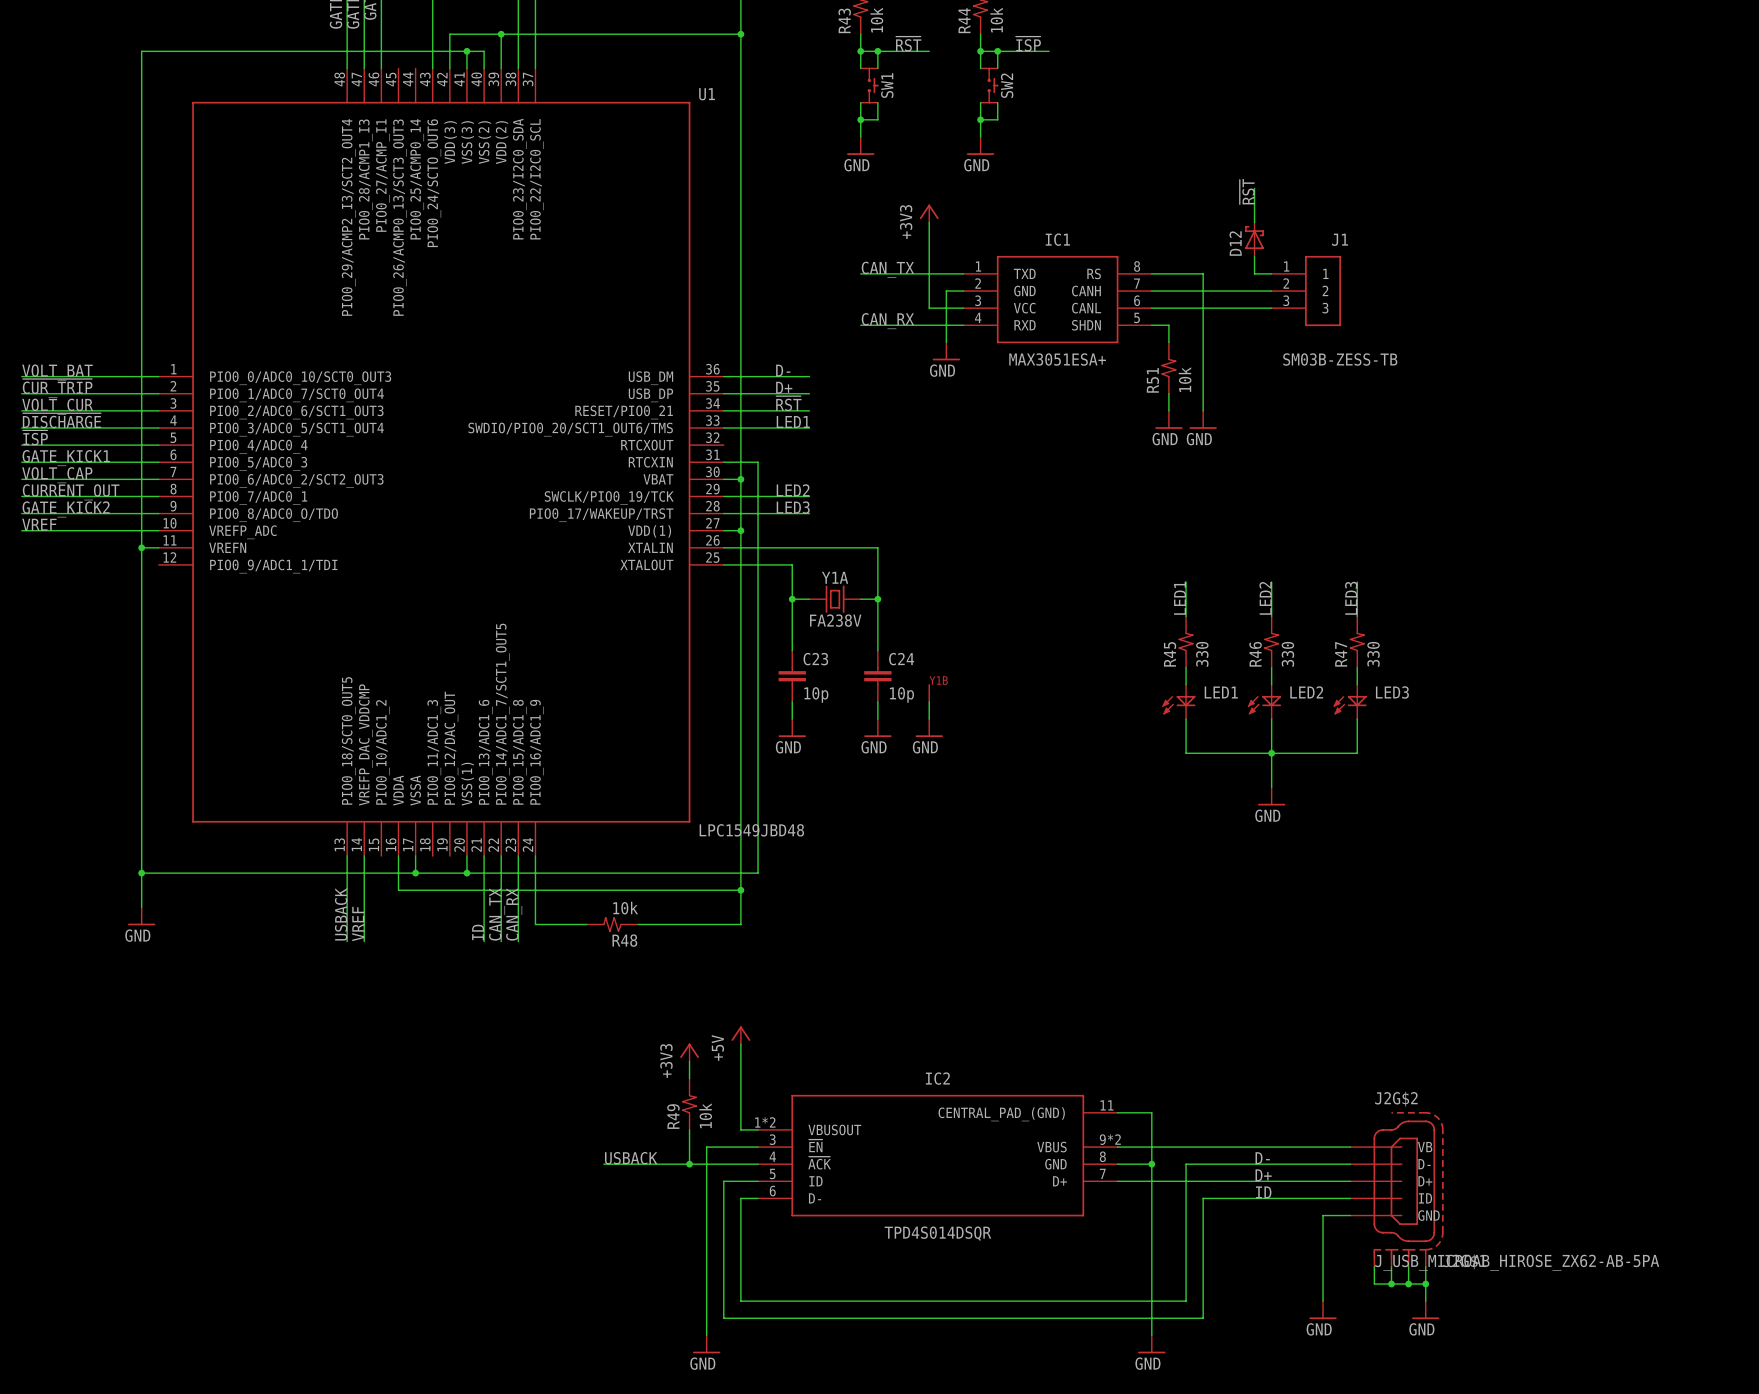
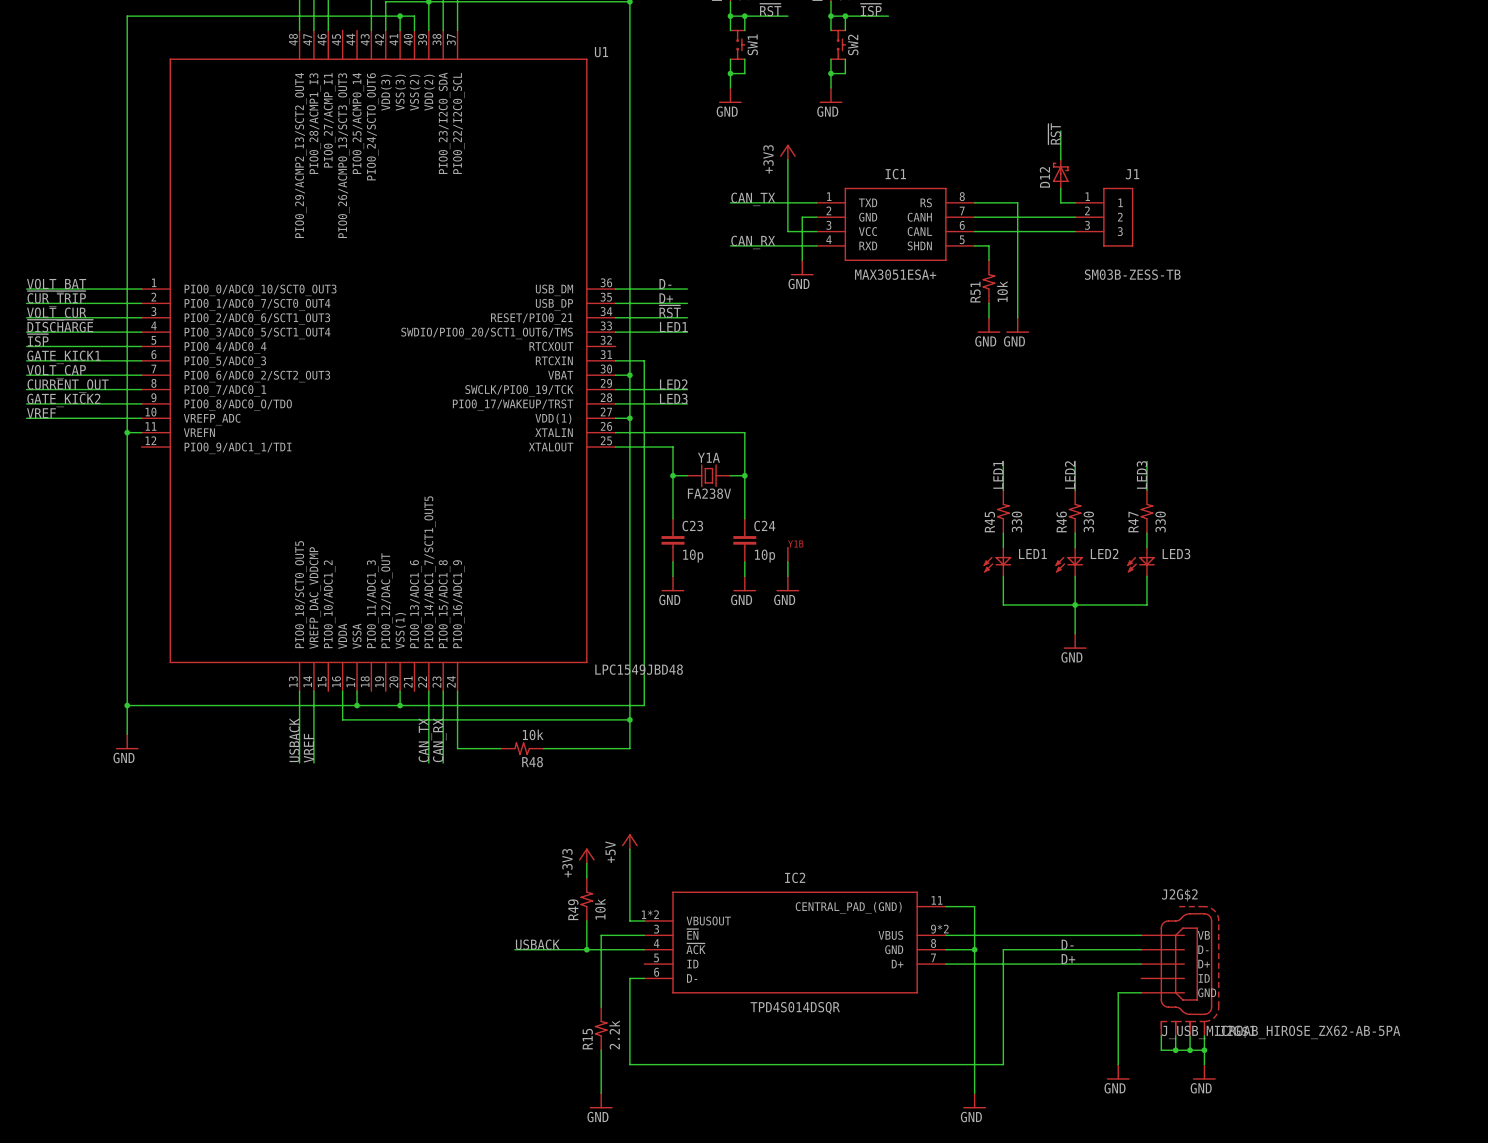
wire: (484, 856) (484, 941) -> none
label: ID (478, 932) -> none
wire: (758, 1181) (723, 1181) (723, 1318) (1203, 1318) (1203, 1198) (1350, 1198) -> none
label: ID (1263, 1192) -> none
R15: none -> 2.2k (601, 1028)

